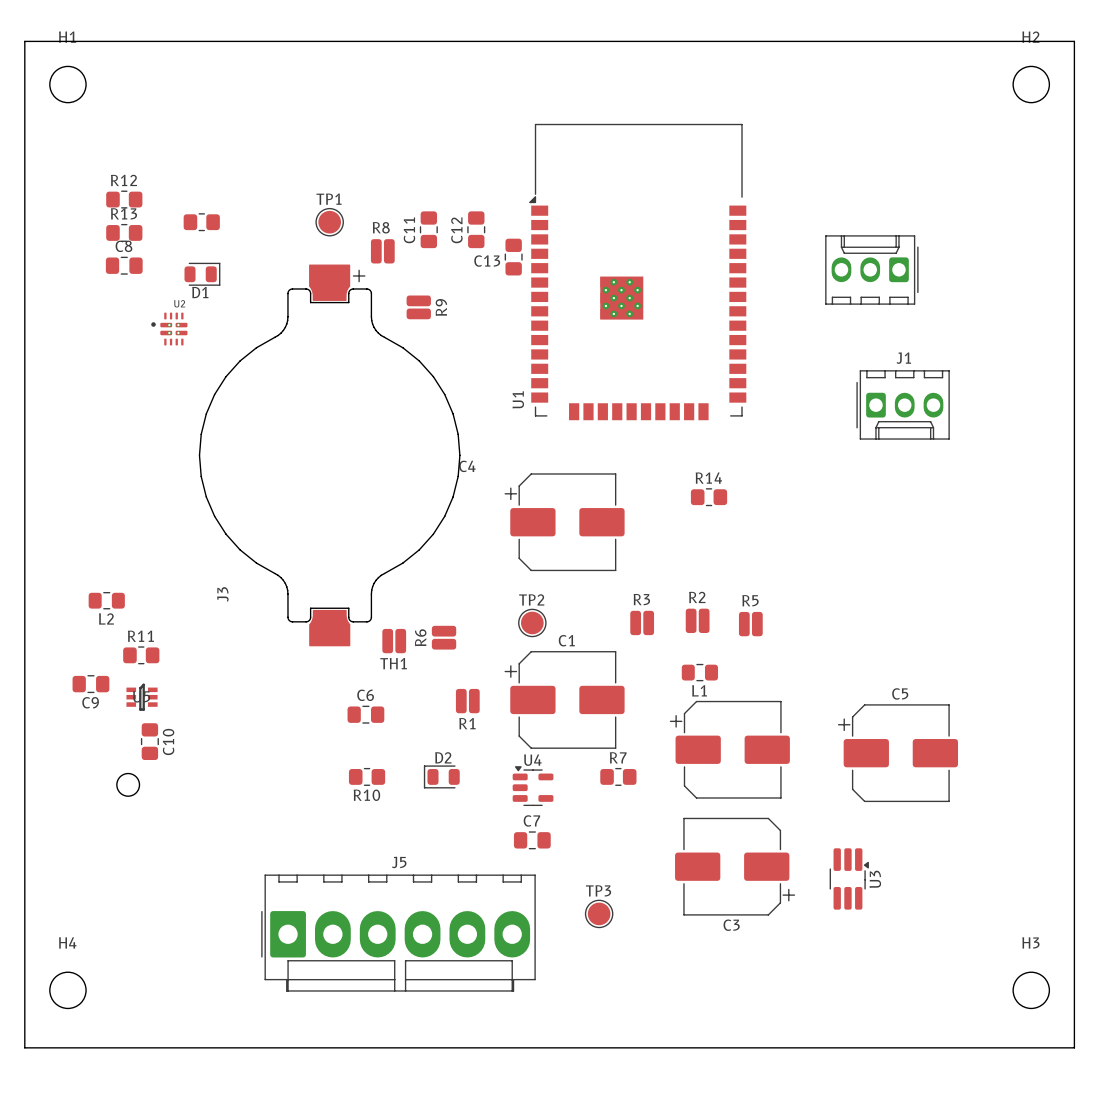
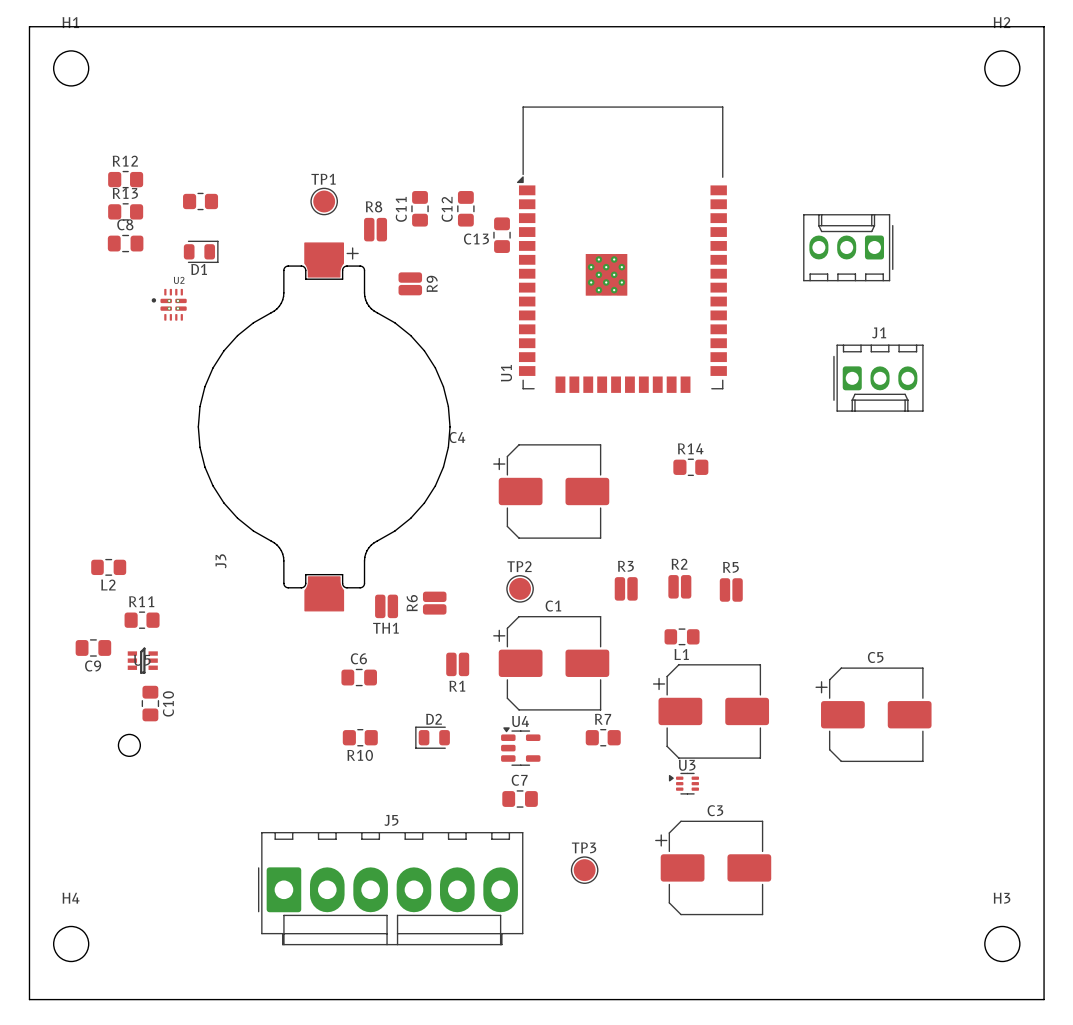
U3 footprint: [829, 848, 869, 910] -> [668, 772, 699, 795]
C3 rotation: 0° (735, 866) -> 180° (713, 867)
U3 name position: U3 (875, 879) -> U3 (687, 765)

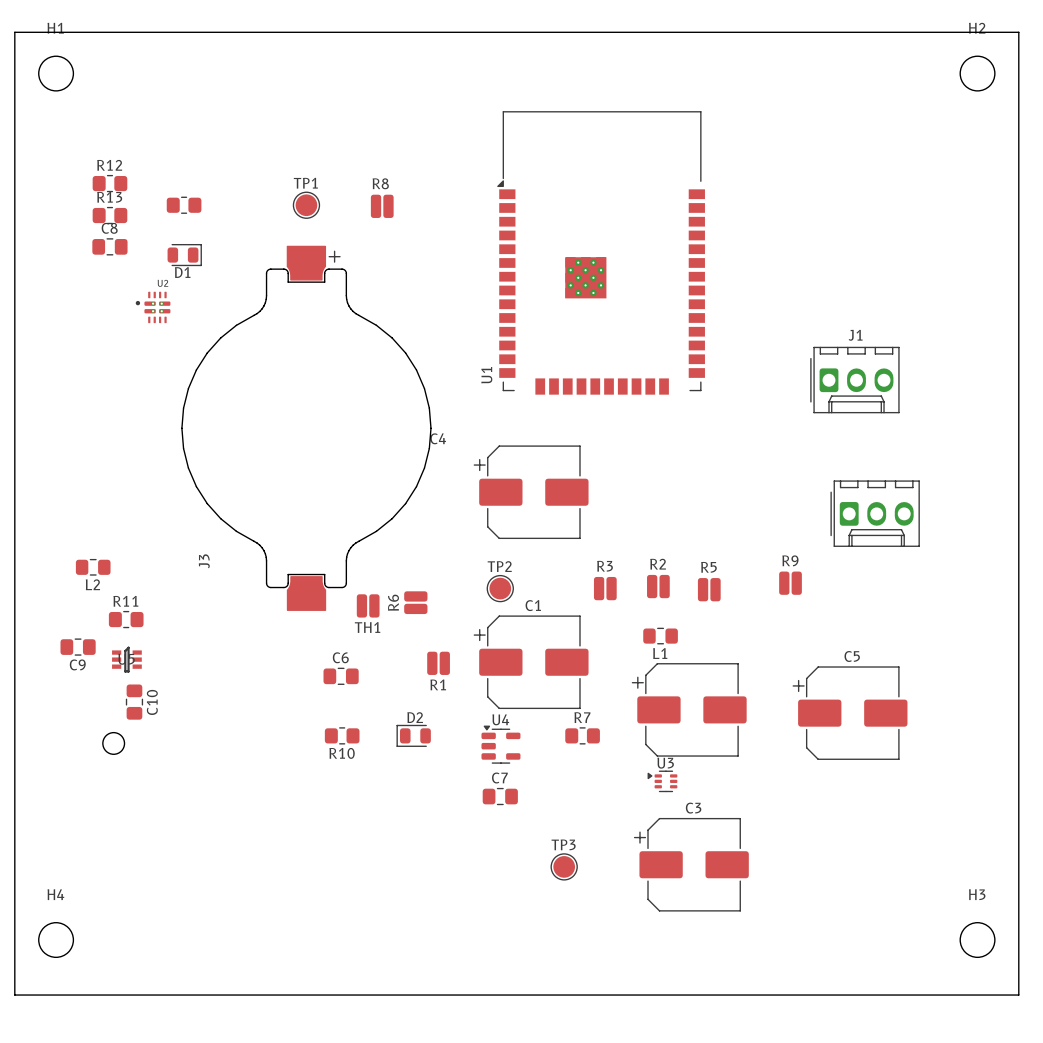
C11: (420, 208) -> none
C12: (465, 208) -> none
R8 position: (375, 229) -> (382, 206)
C13: (502, 235) -> none
part rotation: 0° (848, 247) -> 180° (875, 513)
part position: (848, 247) -> (875, 513)
R9 rotation: 0° (410, 283) -> 90° clockwise (790, 583)
R9 position: (410, 283) -> (790, 583)
R9 name position: R9 (432, 283) -> R9 (790, 560)
R14: (690, 467) -> none
J5: (390, 888) -> none

